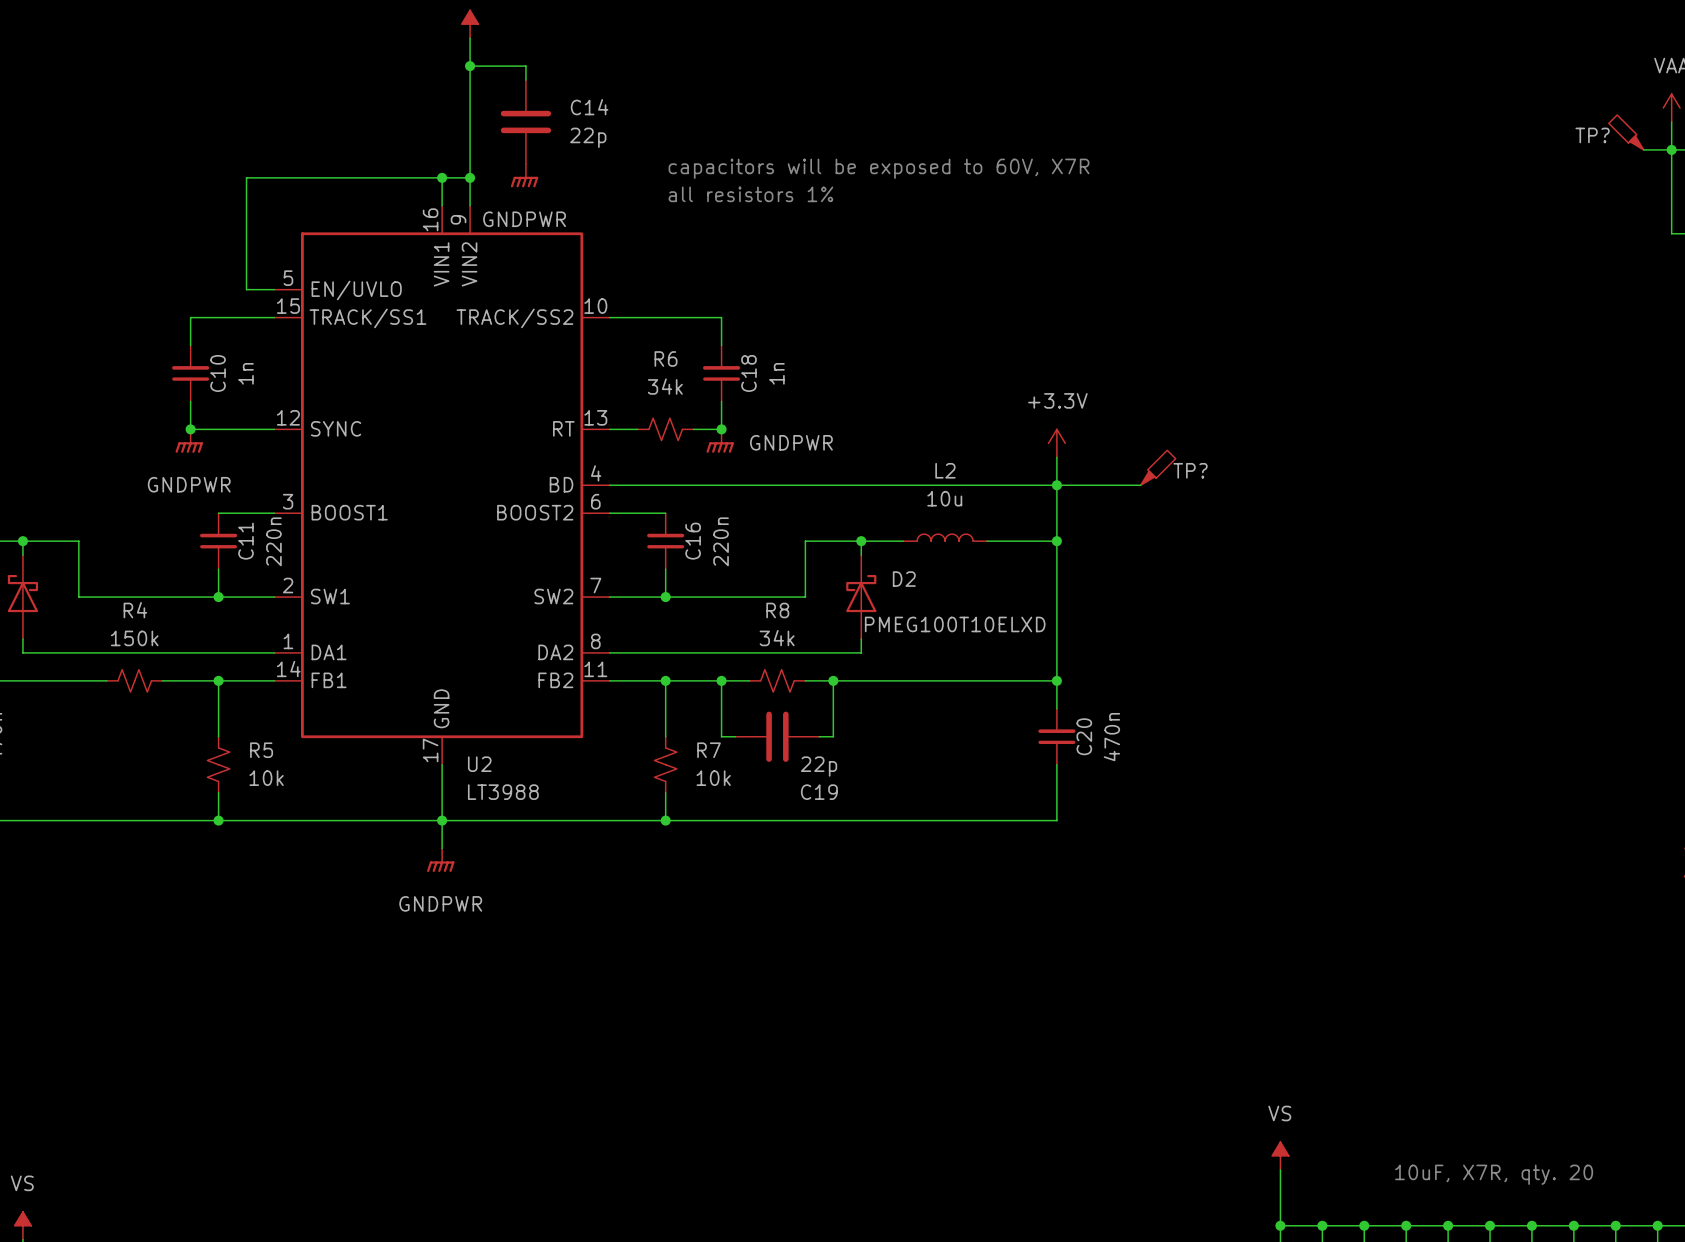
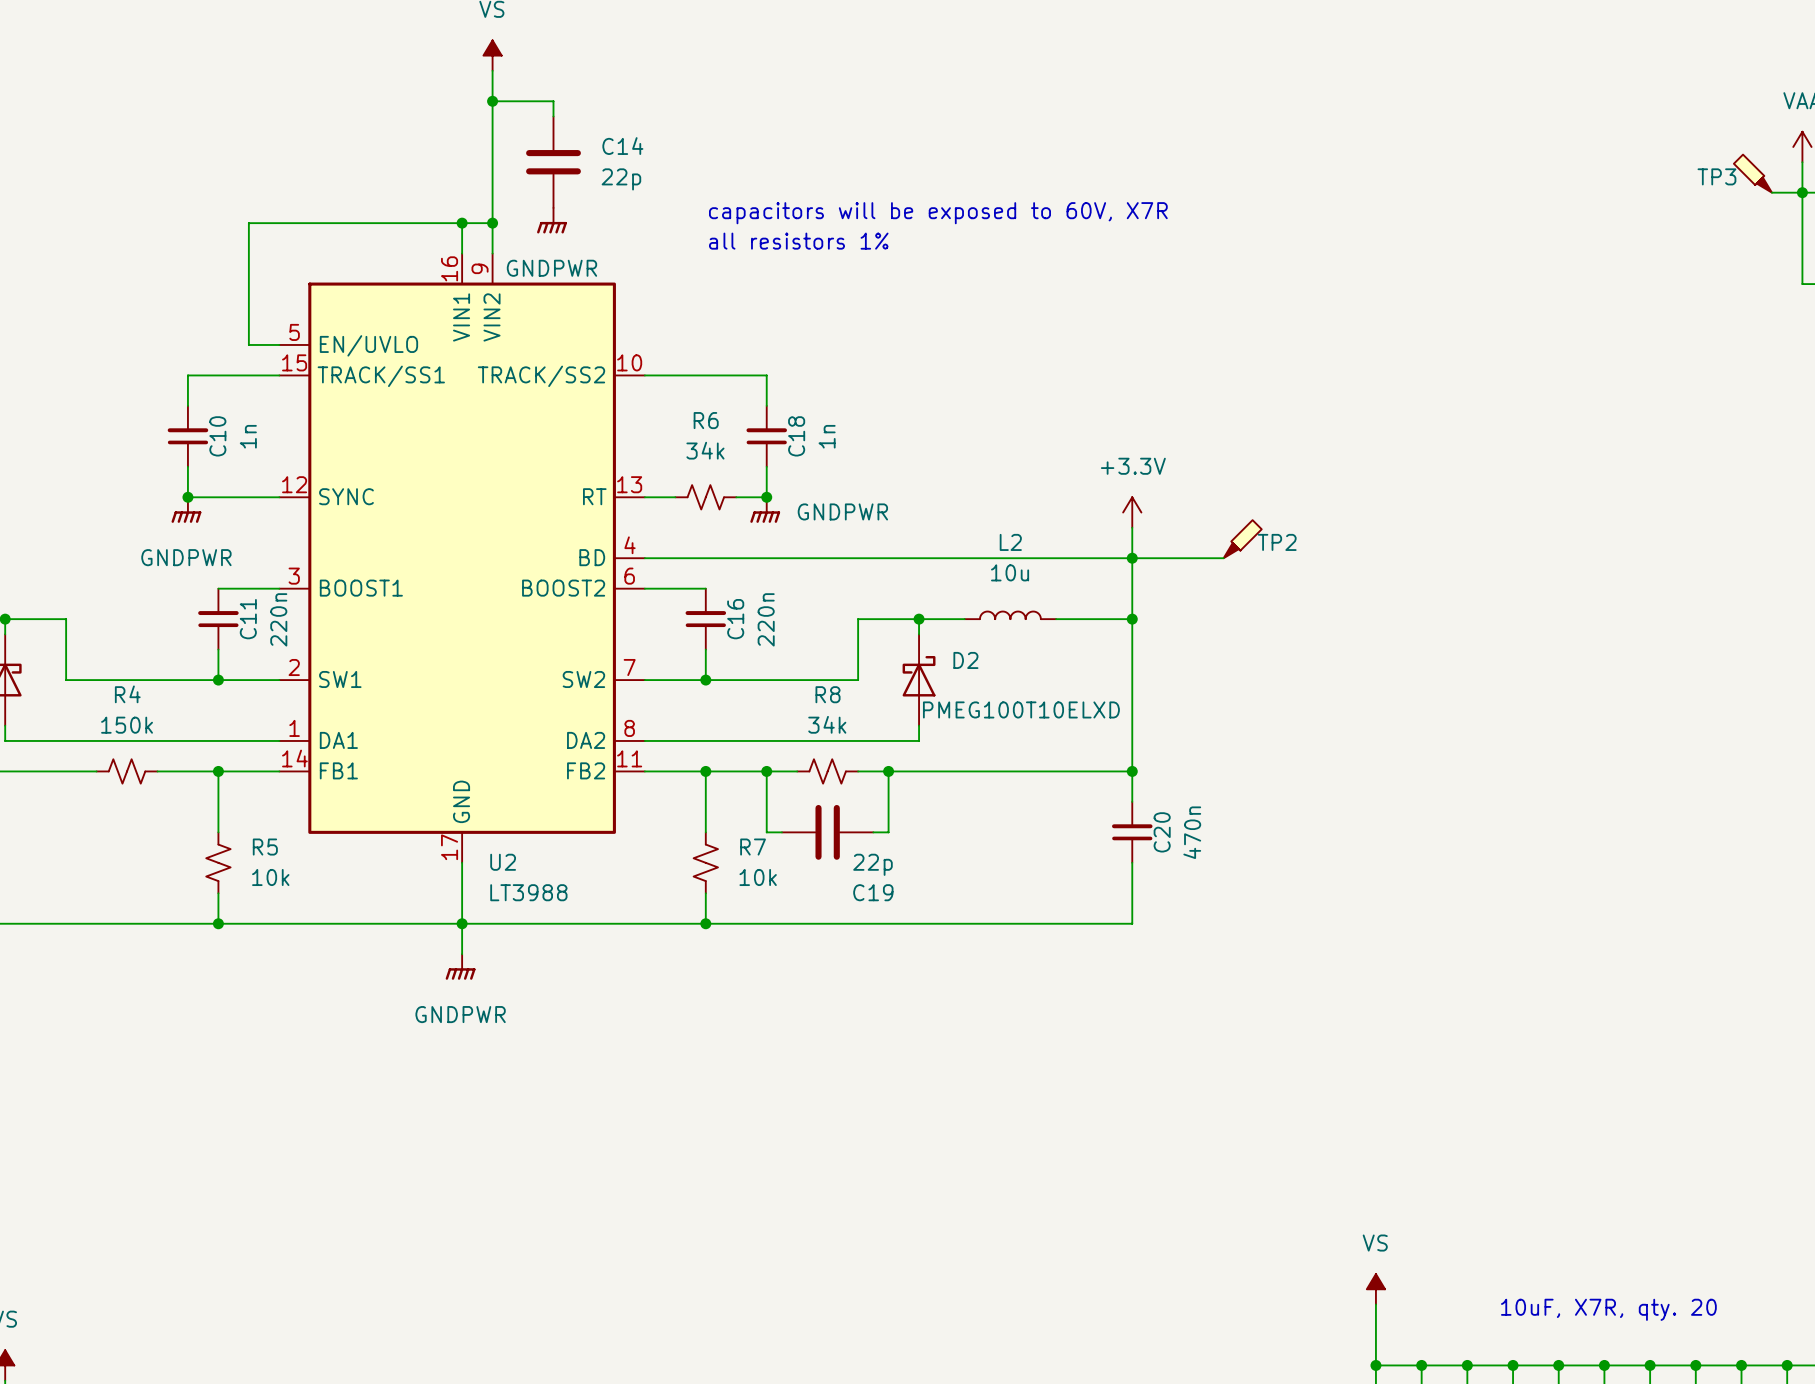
TP? name: TP? (1592, 135) -> TP3 (1716, 176)
TP? name: TP? (1190, 470) -> TP2 (1277, 542)

